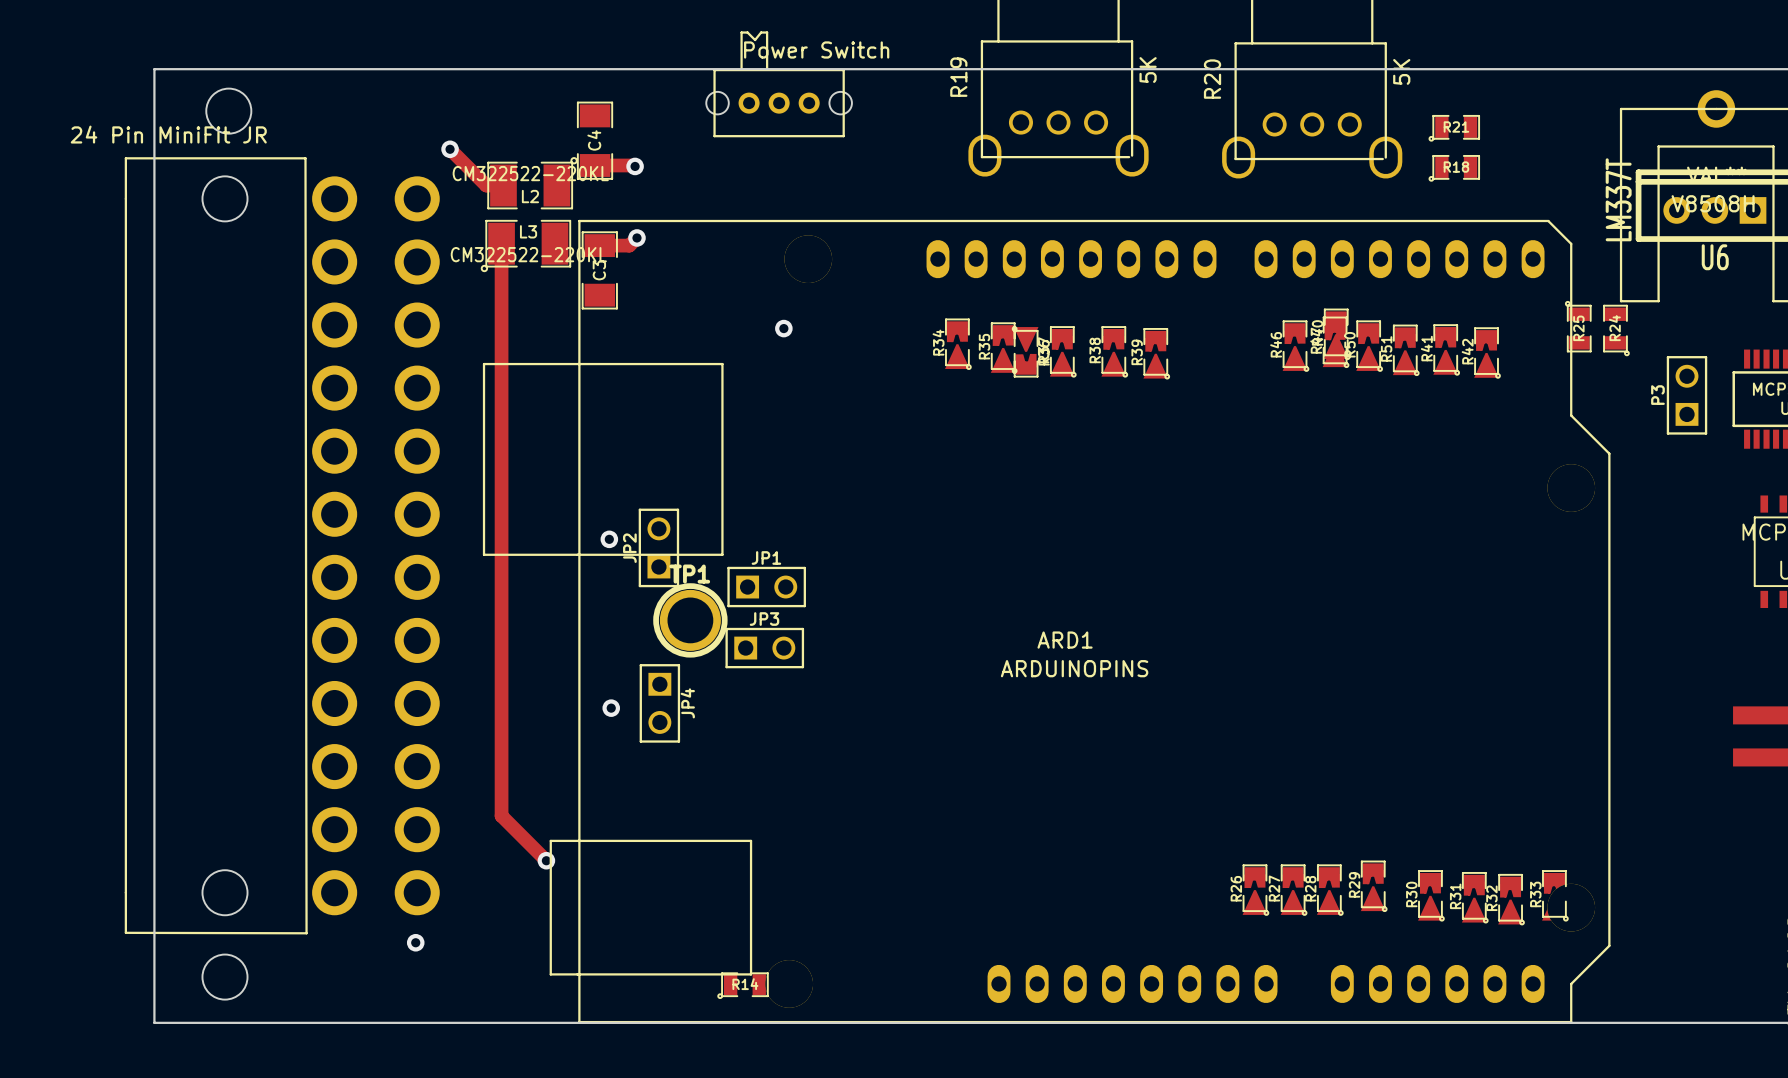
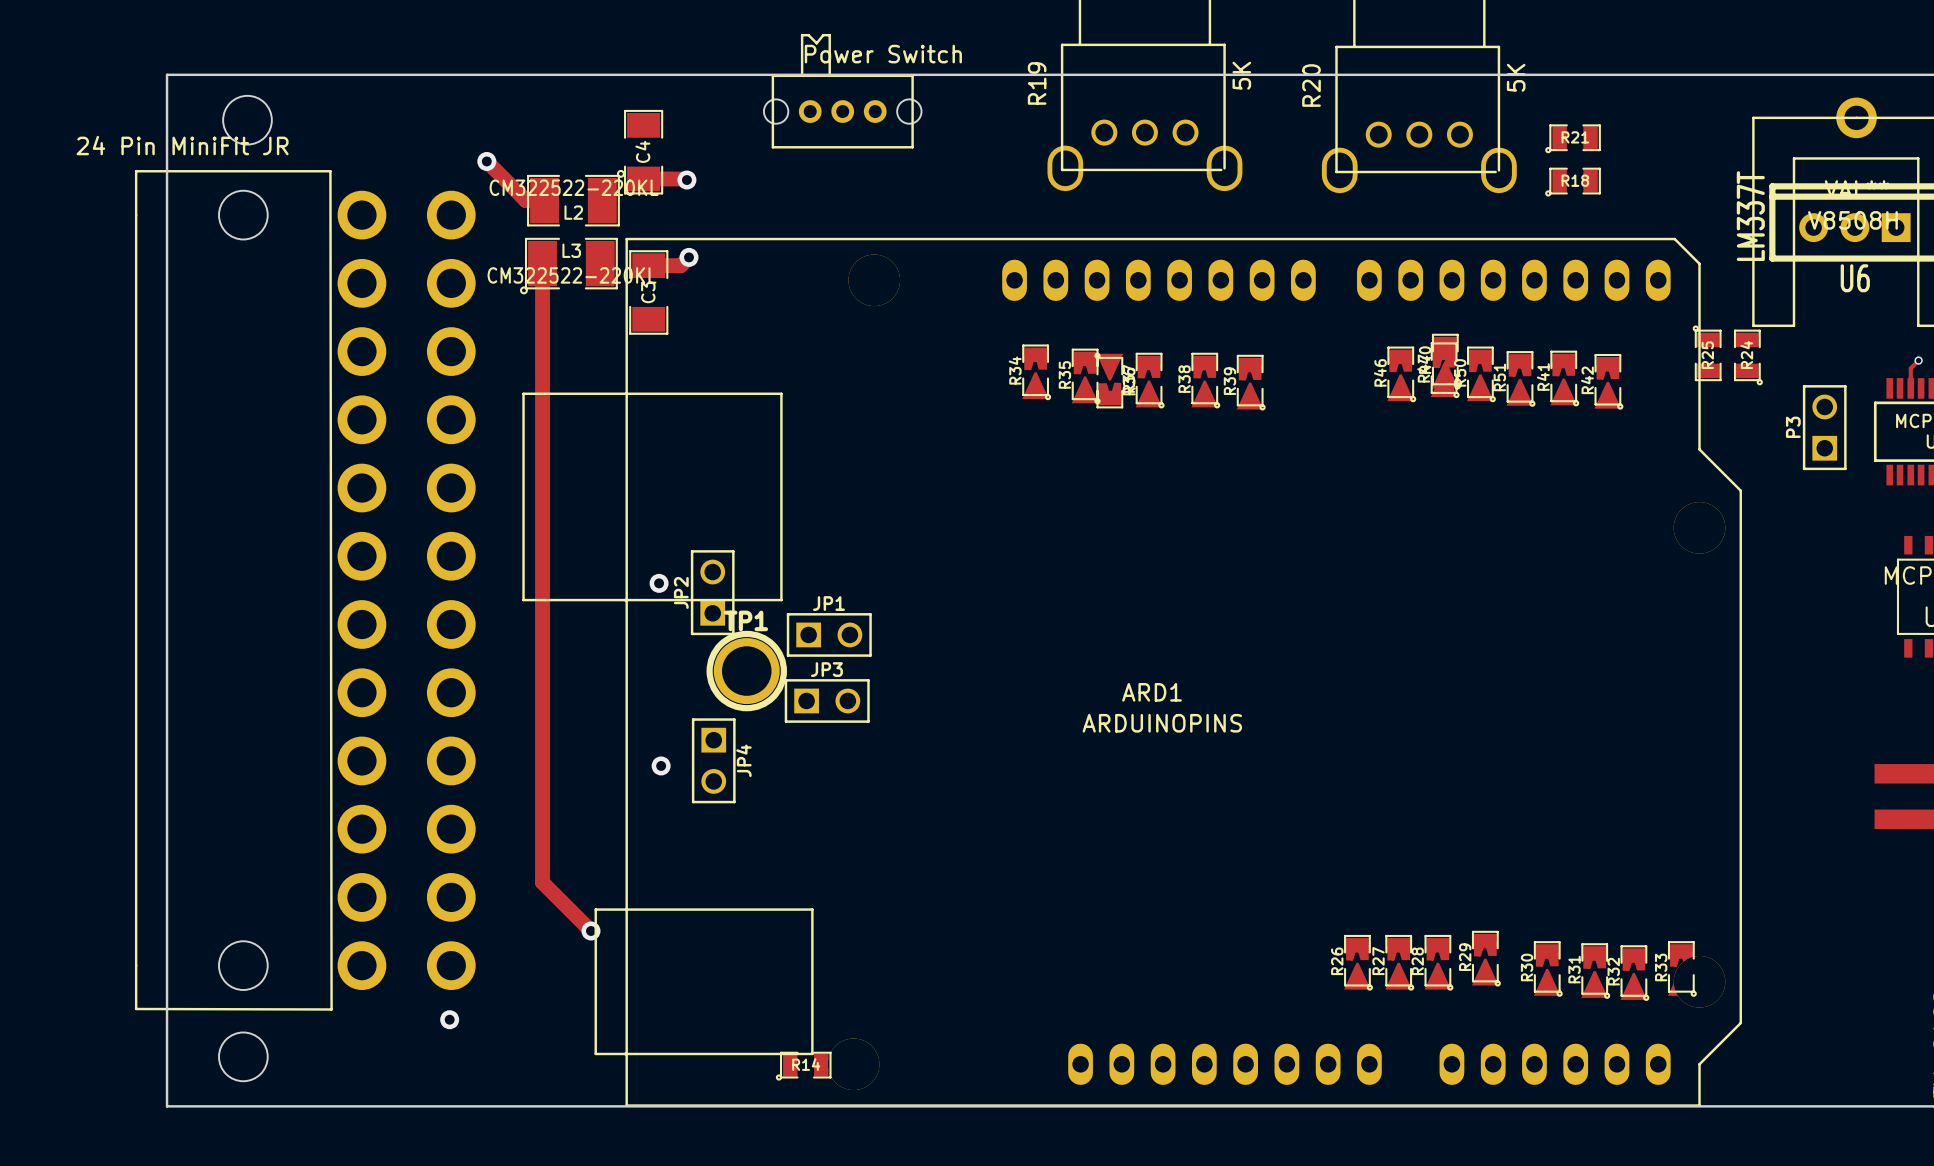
via: (783, 328) -> none
track: none -> (1918, 360) (1910, 368) (1910, 388)
via: none -> (1918, 360)

